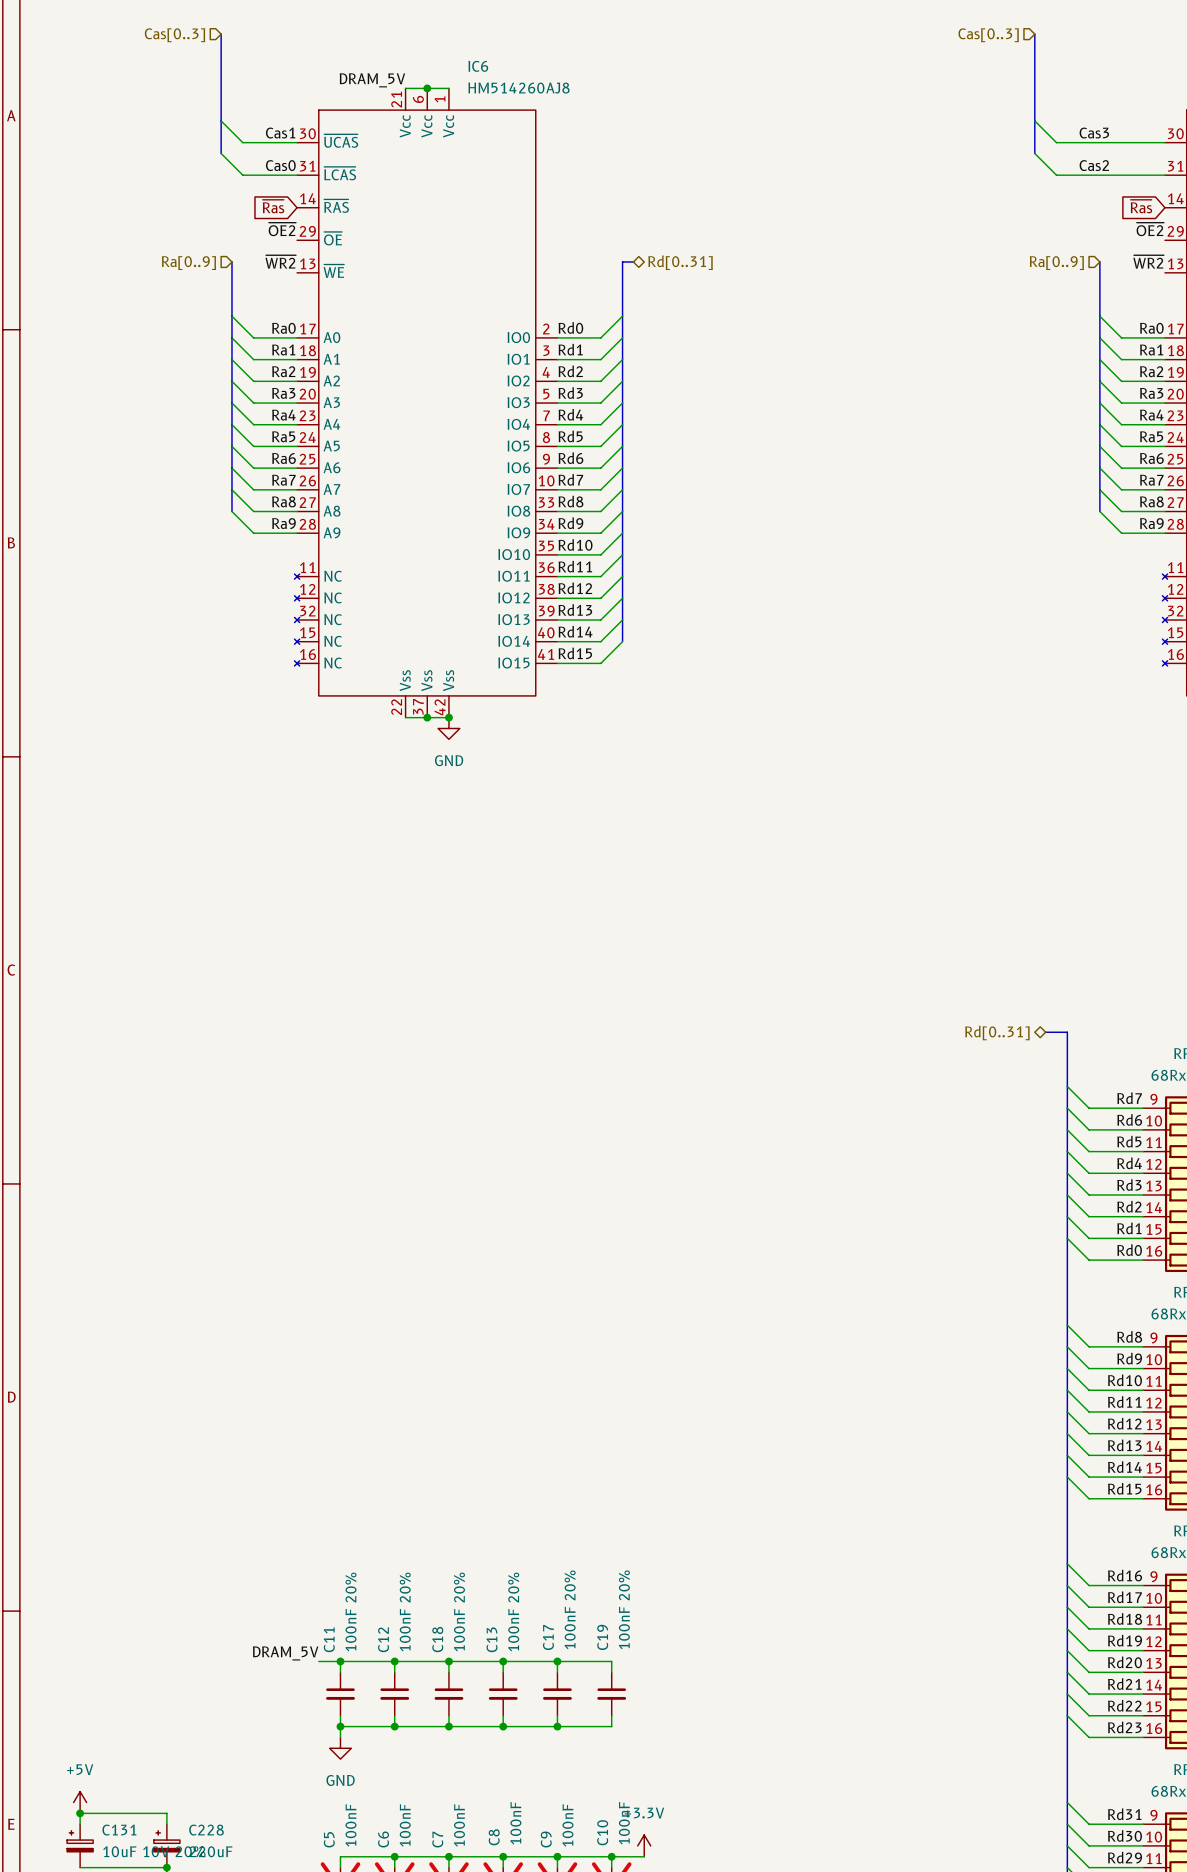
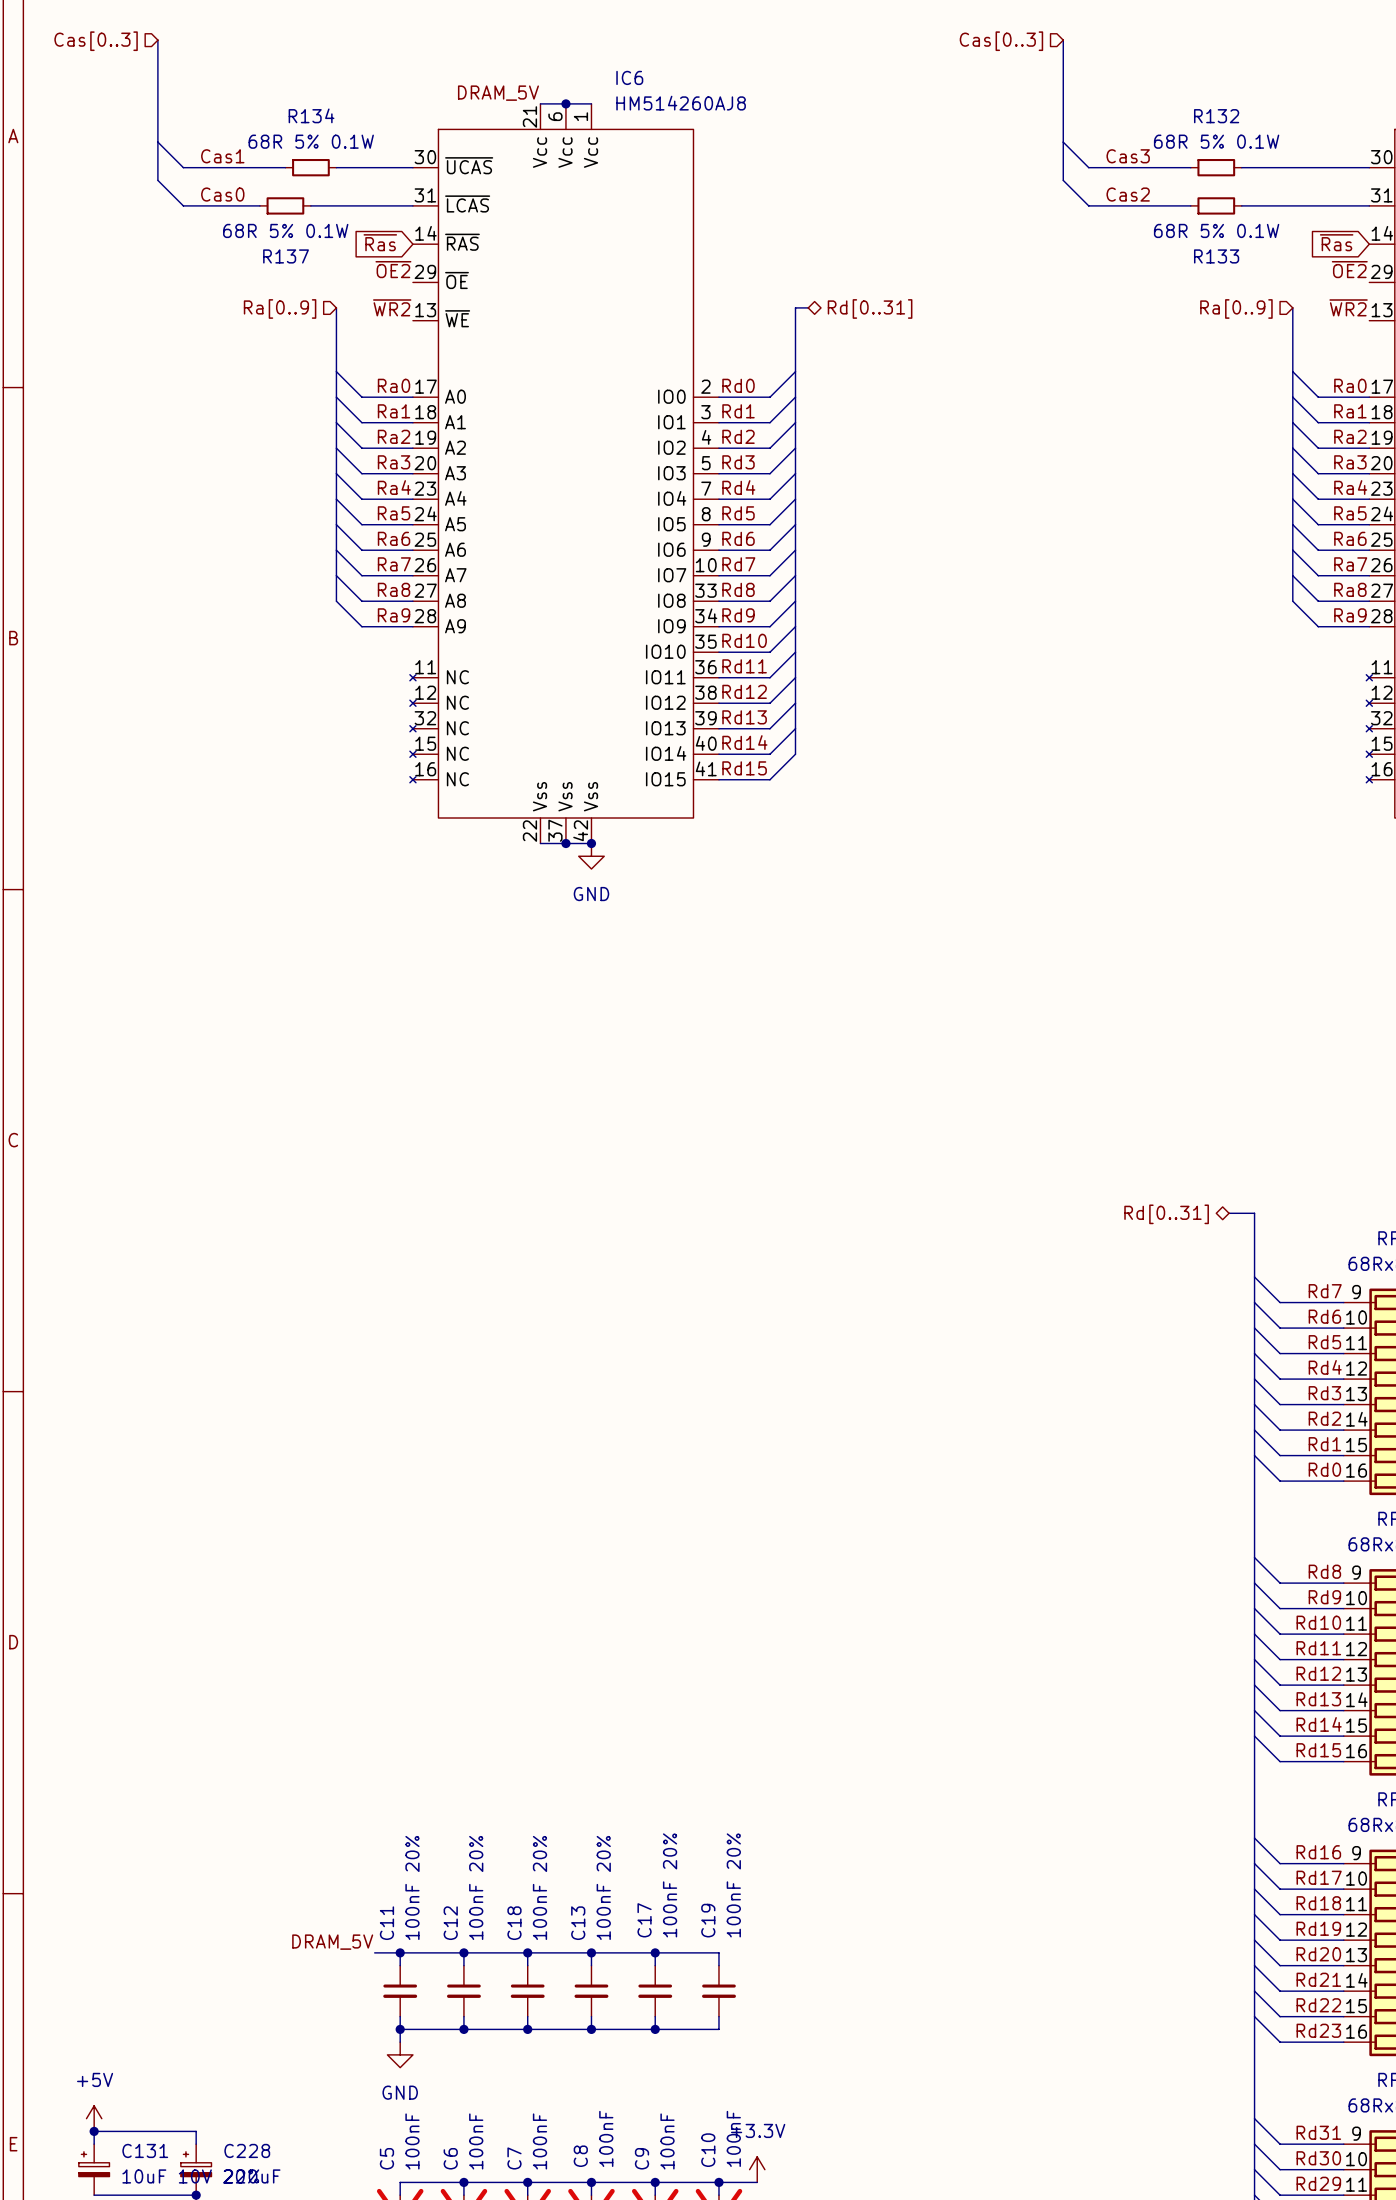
bus: (221, 34) (221, 153) -> (157, 40) (157, 180)
bus: (1034, 34) (1034, 153) -> (1063, 40) (1063, 180)
hierarchical label position: Cas[0..3] (175, 35) -> Cas[0..3] (96, 41)
hierarchical label position: Cas[0..3] (988, 35) -> Cas[0..3] (1001, 41)
label position: DRAM_5V (372, 80) -> DRAM_5V (498, 93)
wire: (405, 88) (448, 88) -> (540, 103) (591, 103)
junction: (427, 88) -> none
junction: none -> (565, 103)
wire: none -> (157, 142) (183, 167) (285, 167)
wire: (221, 120) (242, 142) (286, 142) -> none
wire: none -> (1063, 142) (1088, 167) (1190, 167)
wire: (1034, 120) (1056, 142) -> none
label position: Cas1 (280, 133) -> Cas1 (222, 156)
label position: Cas3 (1094, 133) -> Cas3 (1128, 156)
R134: none -> 68R 5% 0.1W (310, 167)
wire: none -> (349, 167) (412, 167)
R132: none -> 68R 5% 0.1W (1216, 167)
wire: none -> (157, 180) (183, 205) (259, 205)
wire: (221, 153) (242, 175) (264, 175) -> none
wire: none -> (1063, 180) (1088, 205) (1190, 205)
wire: (1034, 153) (1056, 175) -> none
label position: Cas0 (280, 165) -> Cas0 (222, 194)
label position: Cas2 (1094, 165) -> Cas2 (1128, 194)
R137: none -> 68R 5% 0.1W (285, 205)
wire: none -> (349, 205) (412, 205)
R133: none -> 68R 5% 0.1W (1216, 205)
global label position: ~{Ras} (273, 206) -> ~{Ras} (380, 242)
label position: ~{OE2} (282, 229) -> ~{OE2} (393, 269)
bus: (231, 261) (231, 511) -> (336, 307) (336, 601)
label position: ~{WR2} (280, 261) -> ~{WR2} (392, 307)
bus: (633, 261) (622, 261) (622, 641) -> (808, 307) (795, 307) (795, 754)
hierarchical label position: Rd[0..31] (680, 262) -> Rd[0..31] (870, 308)
hierarchical label position: Ra[0..9] (188, 263) -> Ra[0..9] (280, 308)
wire: (231, 316) (253, 337) (297, 337) -> (336, 371) (361, 397) (412, 397)
wire: (622, 316) (600, 337) (557, 337) -> (795, 371) (769, 397) (718, 397)
label position: Rd0 (570, 327) -> Rd0 (738, 385)
label position: Ra0 (283, 328) -> Ra0 (394, 385)
wire: (231, 337) (253, 359) (297, 359) -> (336, 397) (361, 422) (412, 422)
wire: (622, 337) (600, 359) (557, 359) -> (795, 397) (769, 422) (718, 422)
label position: Rd1 (570, 349) -> Rd1 (738, 411)
label position: Ra1 (283, 350) -> Ra1 (394, 411)
wire: (231, 359) (253, 381) (297, 381) -> (336, 422) (361, 448) (412, 448)
wire: (622, 359) (600, 381) (557, 381) -> (795, 422) (769, 448) (718, 448)
label position: Ra2 (283, 371) -> Ra2 (394, 436)
label position: Rd2 (570, 371) -> Rd2 (738, 436)
wire: (231, 381) (253, 403) (297, 403) -> (336, 448) (361, 473) (412, 473)
wire: (622, 381) (600, 403) (557, 403) -> (795, 448) (769, 473) (718, 473)
label position: Ra3 (283, 393) -> Ra3 (394, 462)
label position: Rd3 (570, 393) -> Rd3 (738, 462)
wire: (231, 403) (253, 424) (297, 424) -> (336, 473) (361, 499) (412, 499)
IC6 position: (425, 403) -> (564, 473)
wire: (622, 403) (600, 424) (557, 424) -> (795, 473) (769, 499) (718, 499)
label position: Rd4 (570, 414) -> Rd4 (738, 487)
label position: Ra4 (283, 415) -> Ra4 (394, 487)
wire: (231, 424) (253, 446) (297, 446) -> (336, 499) (361, 524) (412, 524)
wire: (622, 424) (600, 446) (557, 446) -> (795, 499) (769, 524) (718, 524)
label position: Ra5 (283, 436) -> Ra5 (394, 513)
label position: Rd5 (570, 436) -> Rd5 (738, 513)
wire: (231, 446) (253, 468) (297, 468) -> (336, 524) (361, 550) (412, 550)
wire: (622, 446) (600, 468) (557, 468) -> (795, 524) (769, 550) (718, 550)
label position: Ra6 (283, 458) -> Ra6 (394, 538)
label position: Rd6 (570, 458) -> Rd6 (738, 538)
wire: (231, 468) (253, 489) (297, 489) -> (336, 550) (361, 575) (412, 575)
wire: (622, 468) (600, 489) (557, 489) -> (795, 550) (769, 575) (718, 575)
label position: Rd7 (570, 479) -> Rd7 (738, 564)
label position: Ra7 (283, 480) -> Ra7 (394, 564)
wire: (231, 489) (253, 511) (297, 511) -> (336, 575) (361, 601) (412, 601)
wire: (622, 489) (600, 511) (557, 511) -> (795, 575) (769, 601) (718, 601)
label position: Ra8 (284, 501) -> Ra8 (394, 589)
label position: Rd8 (570, 501) -> Rd8 (738, 589)
wire: (231, 511) (253, 533) (297, 533) -> (336, 601) (361, 626) (412, 626)
wire: (622, 511) (600, 533) (557, 533) -> (795, 601) (769, 626) (718, 626)
label position: Ra9 (283, 523) -> Ra9 (394, 615)
label position: Rd9 (570, 523) -> Rd9 (738, 615)
wire: (622, 533) (600, 554) (557, 554) -> (795, 626) (769, 652) (718, 652)
label position: Rd10 (575, 544) -> Rd10 (744, 640)
wire: (622, 554) (600, 576) (557, 576) -> (795, 652) (769, 677) (718, 677)
label position: Rd11 (575, 566) -> Rd11 (744, 666)
wire: (622, 576) (600, 598) (557, 598) -> (795, 677) (769, 703) (718, 703)
label position: Rd12 (575, 588) -> Rd12 (744, 691)
wire: (622, 598) (600, 620) (557, 620) -> (795, 703) (769, 728) (718, 728)
label position: Rd13 (575, 610) -> Rd13 (744, 717)
wire: (622, 620) (600, 641) (557, 641) -> (795, 728) (769, 754) (718, 754)
label position: Rd14 (575, 631) -> Rd14 (744, 742)
wire: (622, 641) (600, 663) (557, 663) -> (795, 754) (769, 779) (718, 779)
label position: Rd15 (575, 653) -> Rd15 (744, 768)
wire: (405, 717) (448, 717) -> (540, 843) (591, 843)
junction: (427, 717) -> none
junction: (448, 717) -> none
junction: none -> (565, 843)
junction: none -> (591, 843)
power symbol position: GND (448, 728) -> GND (591, 856)

